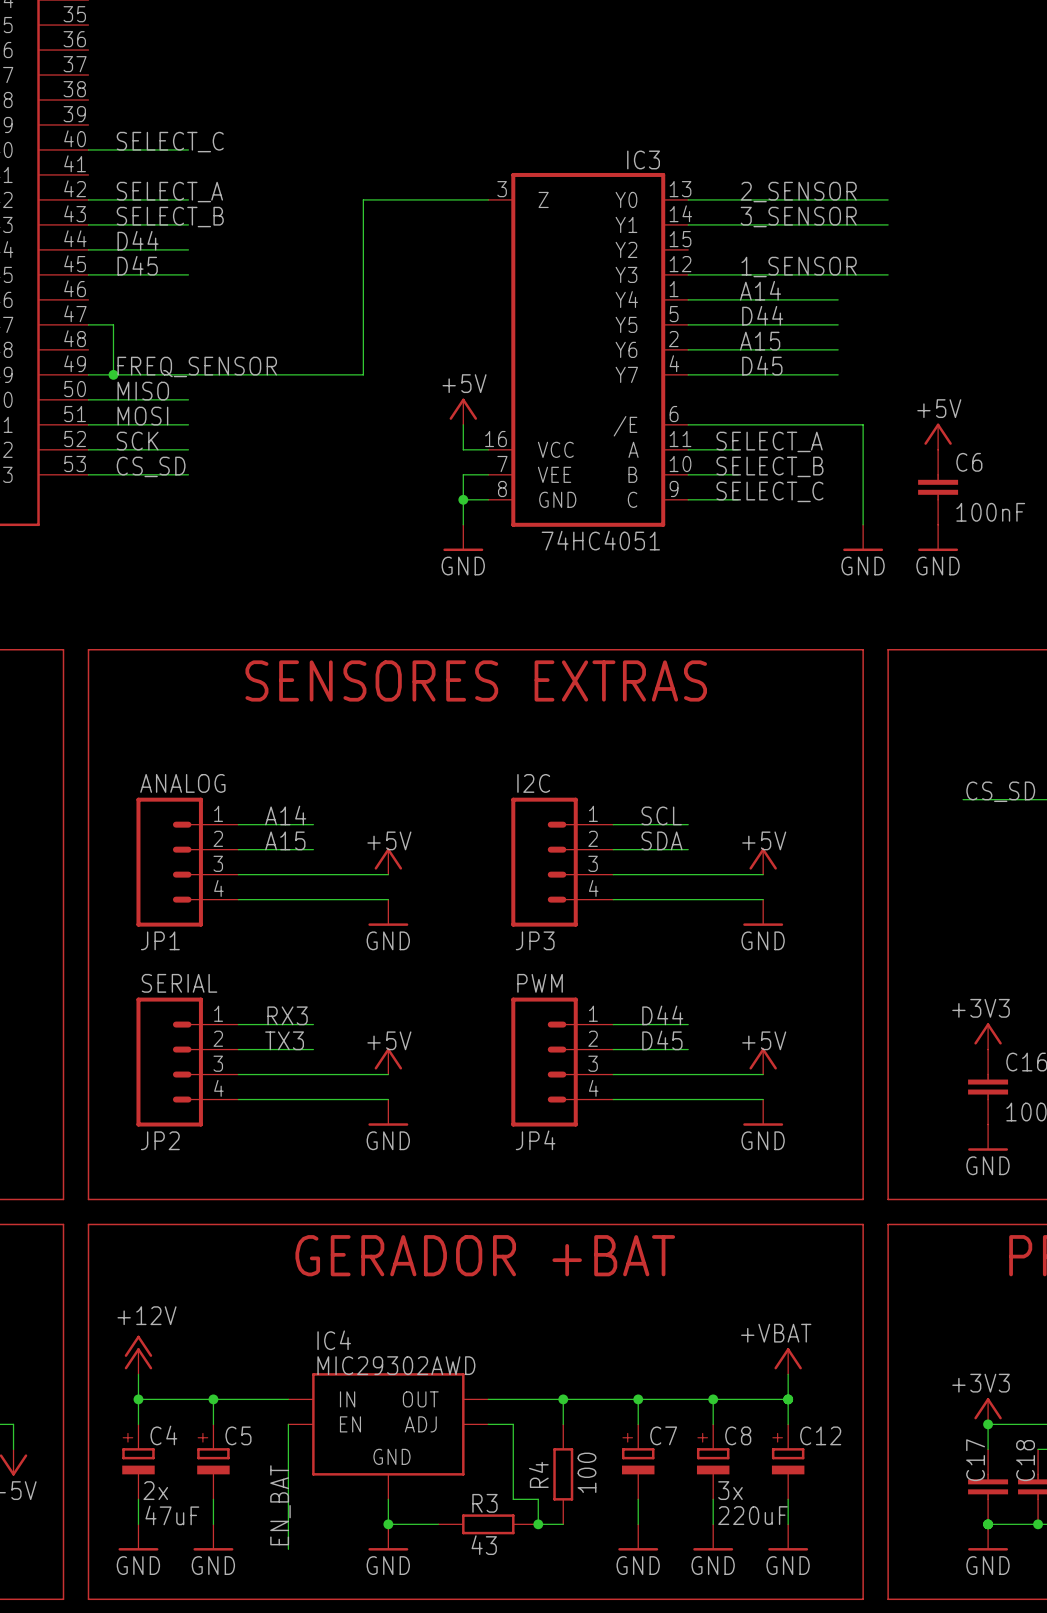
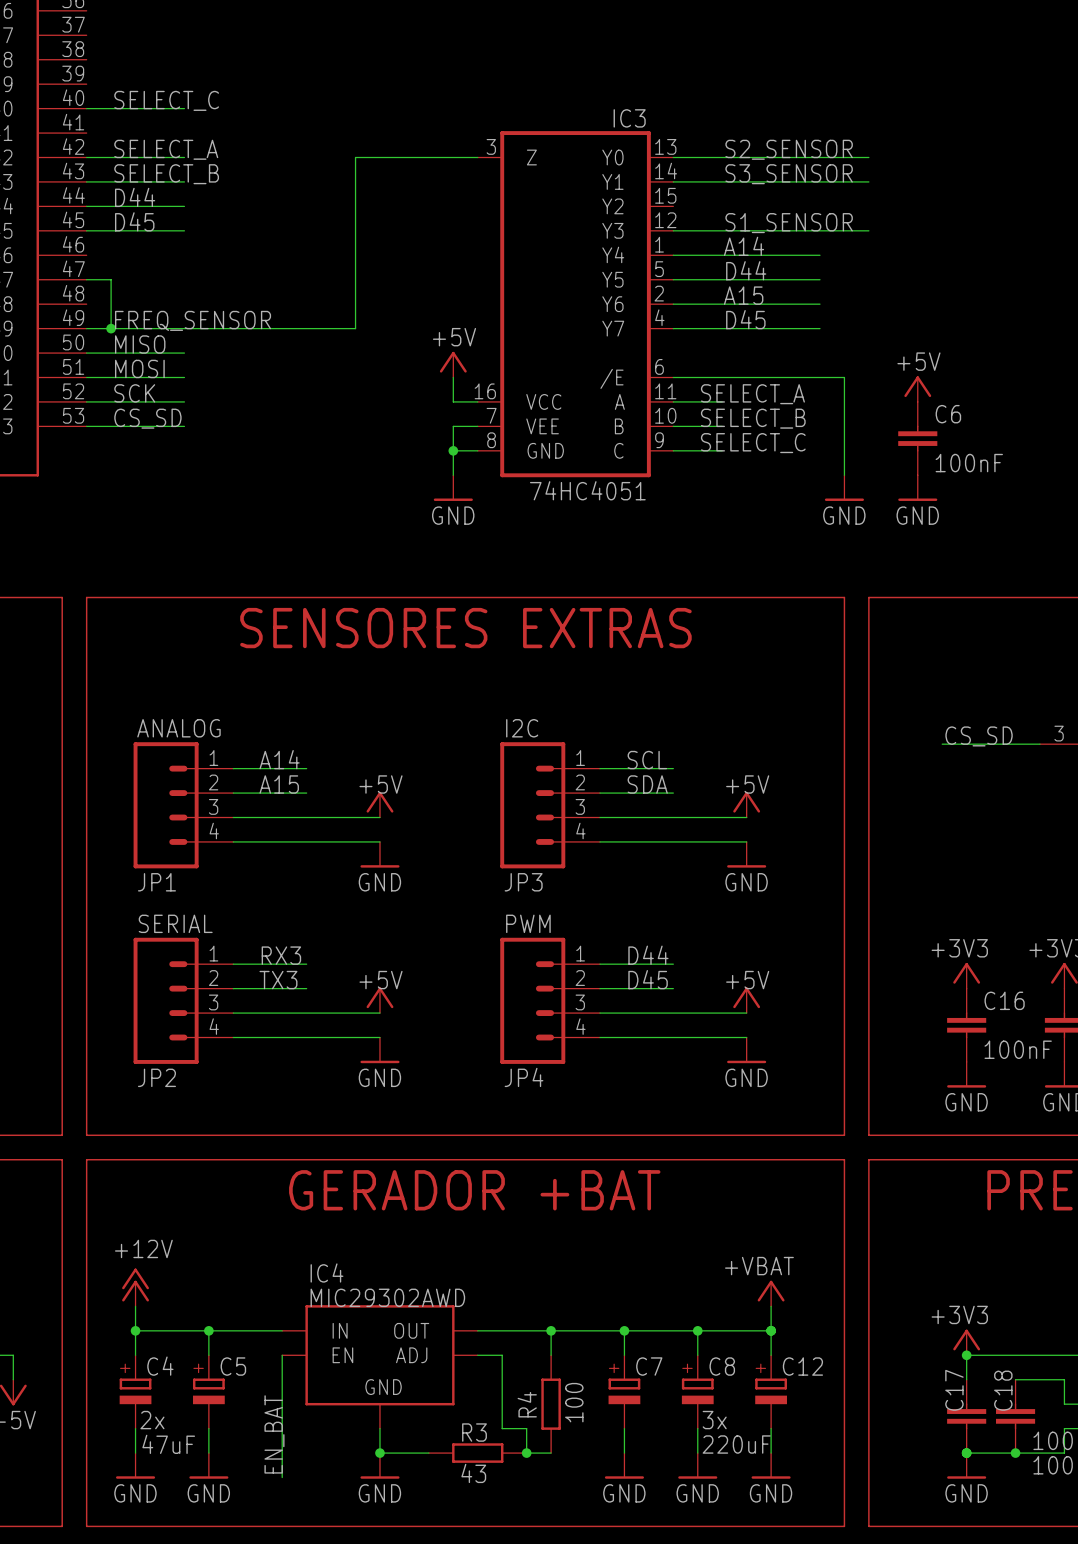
label: 2_SENSOR (798, 192) -> S2_SENSOR (789, 149)
label: 3_SENSOR (798, 217) -> S3_SENSOR (789, 174)
label: 1_SENSOR (799, 267) -> S1_SENSOR (789, 223)

